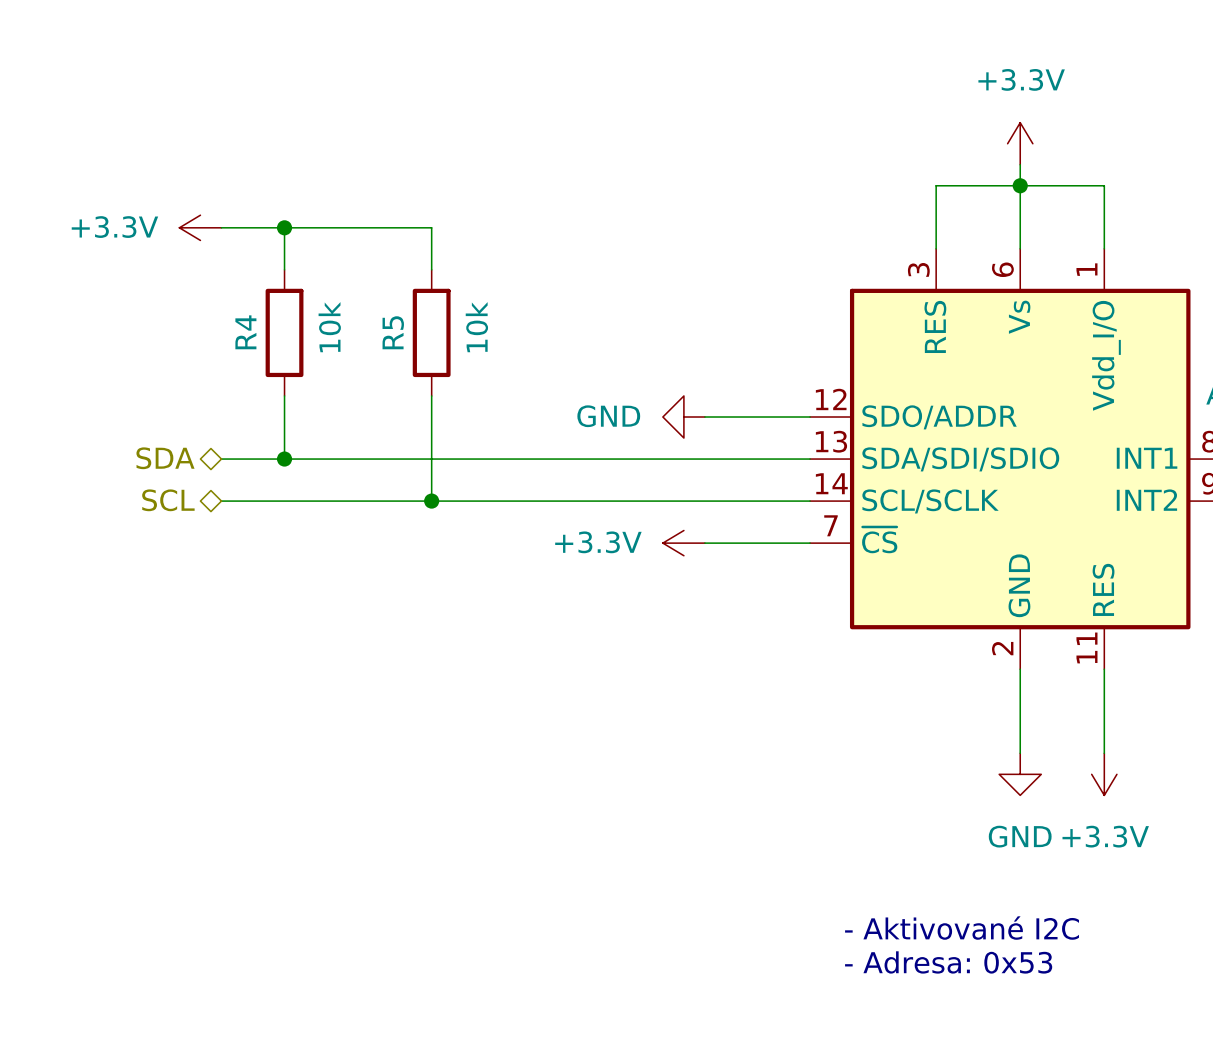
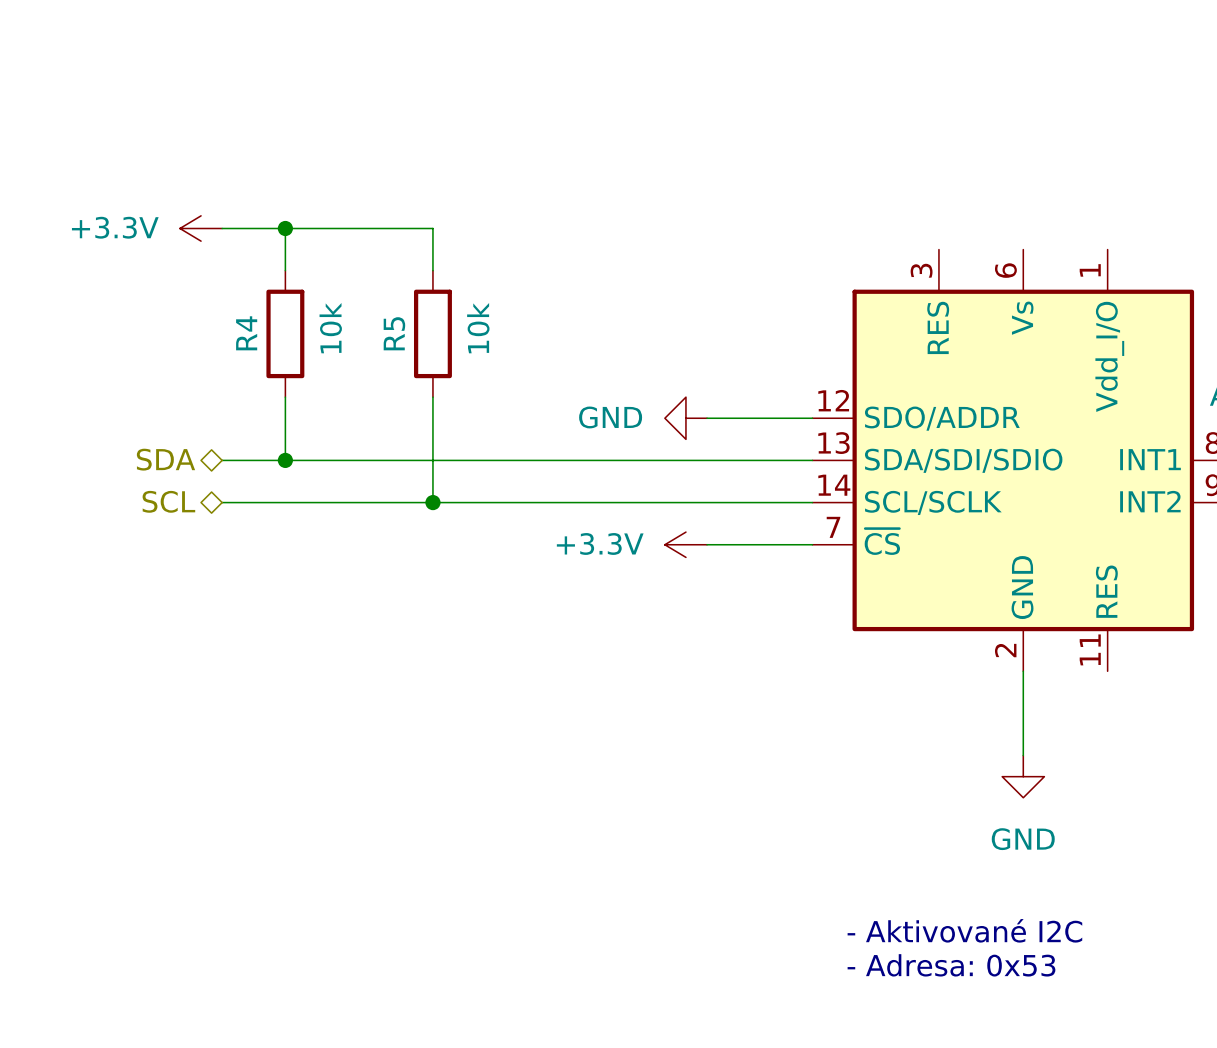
power symbol: +3.3V (1020, 143) -> none
wire: (1020, 164) (1020, 248) -> none
junction: (1020, 185) -> none
wire: (936, 248) (936, 185) (1104, 185) (1104, 248) -> none
wire: (1104, 669) (1104, 753) -> none
power symbol: +3.3V (1104, 774) -> none

